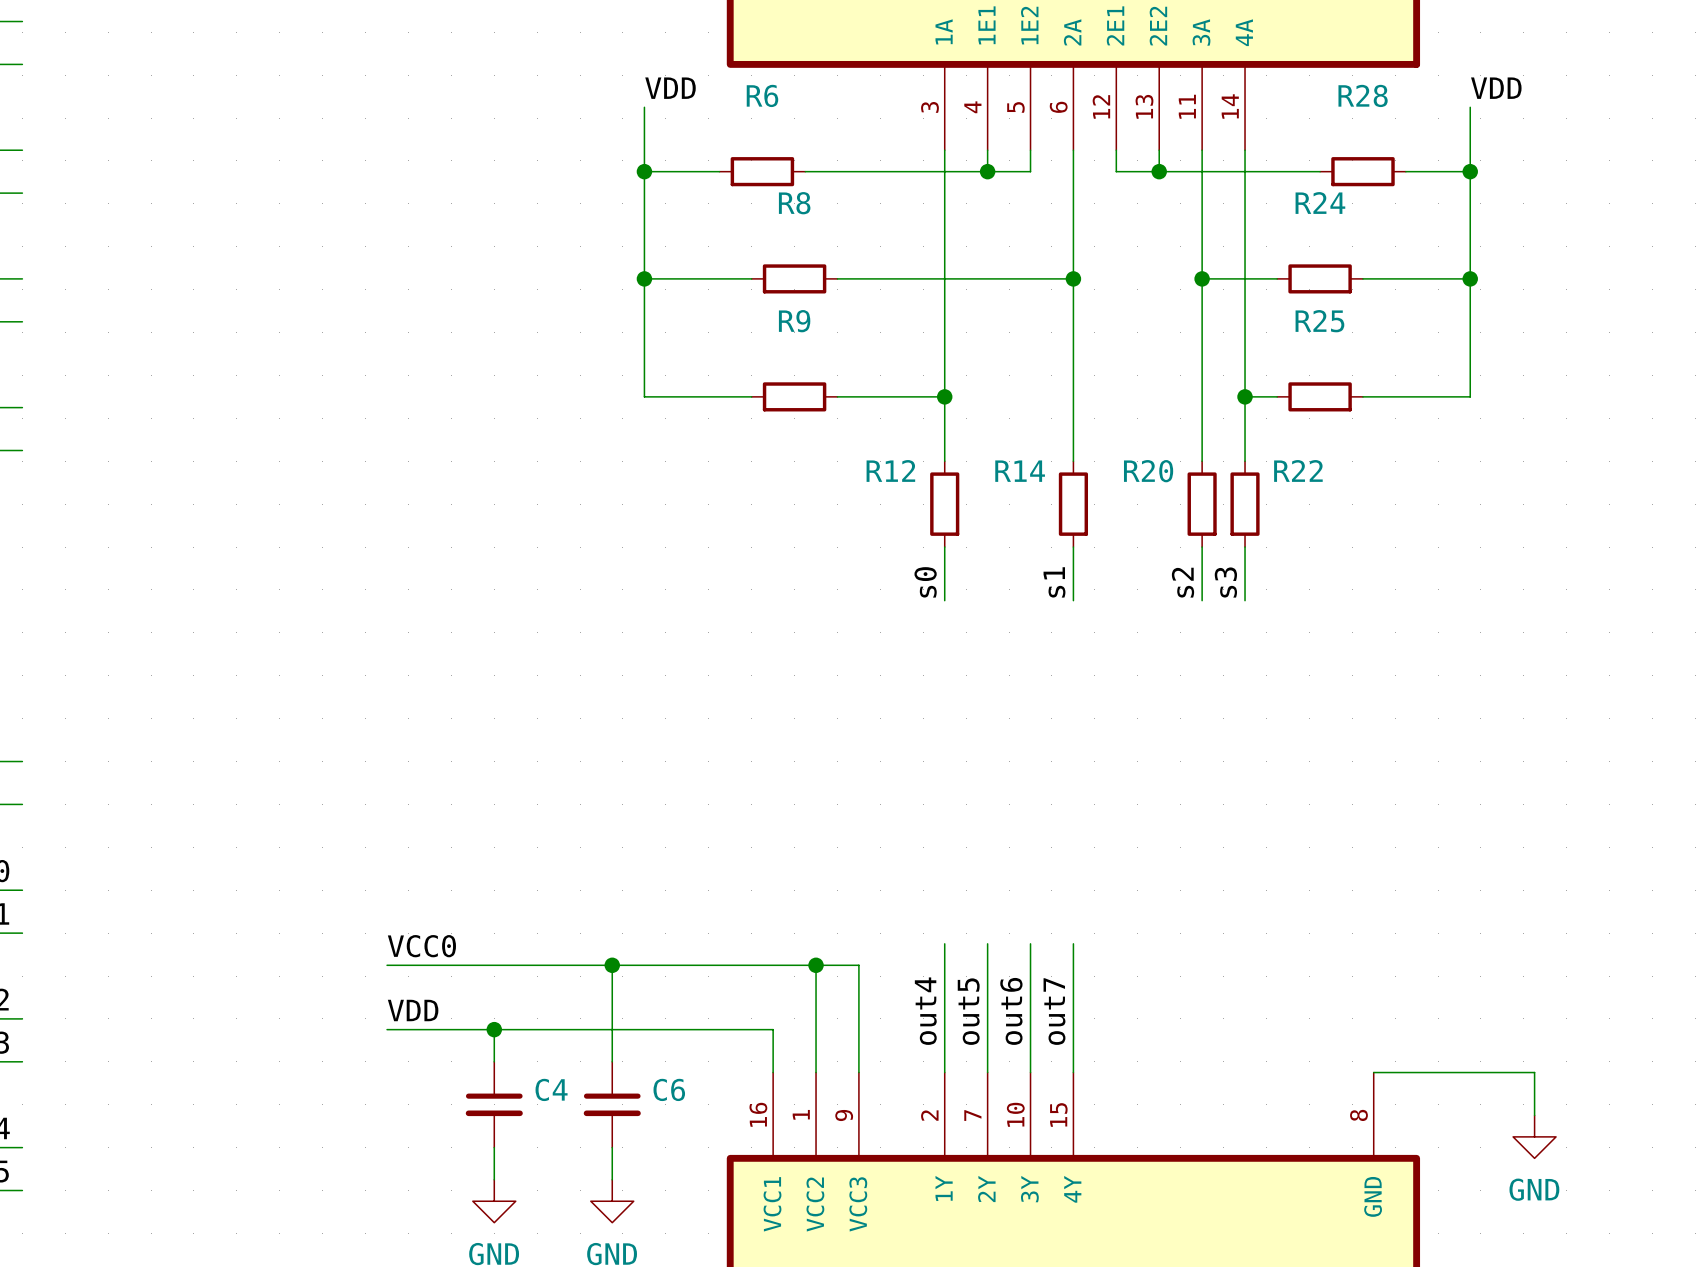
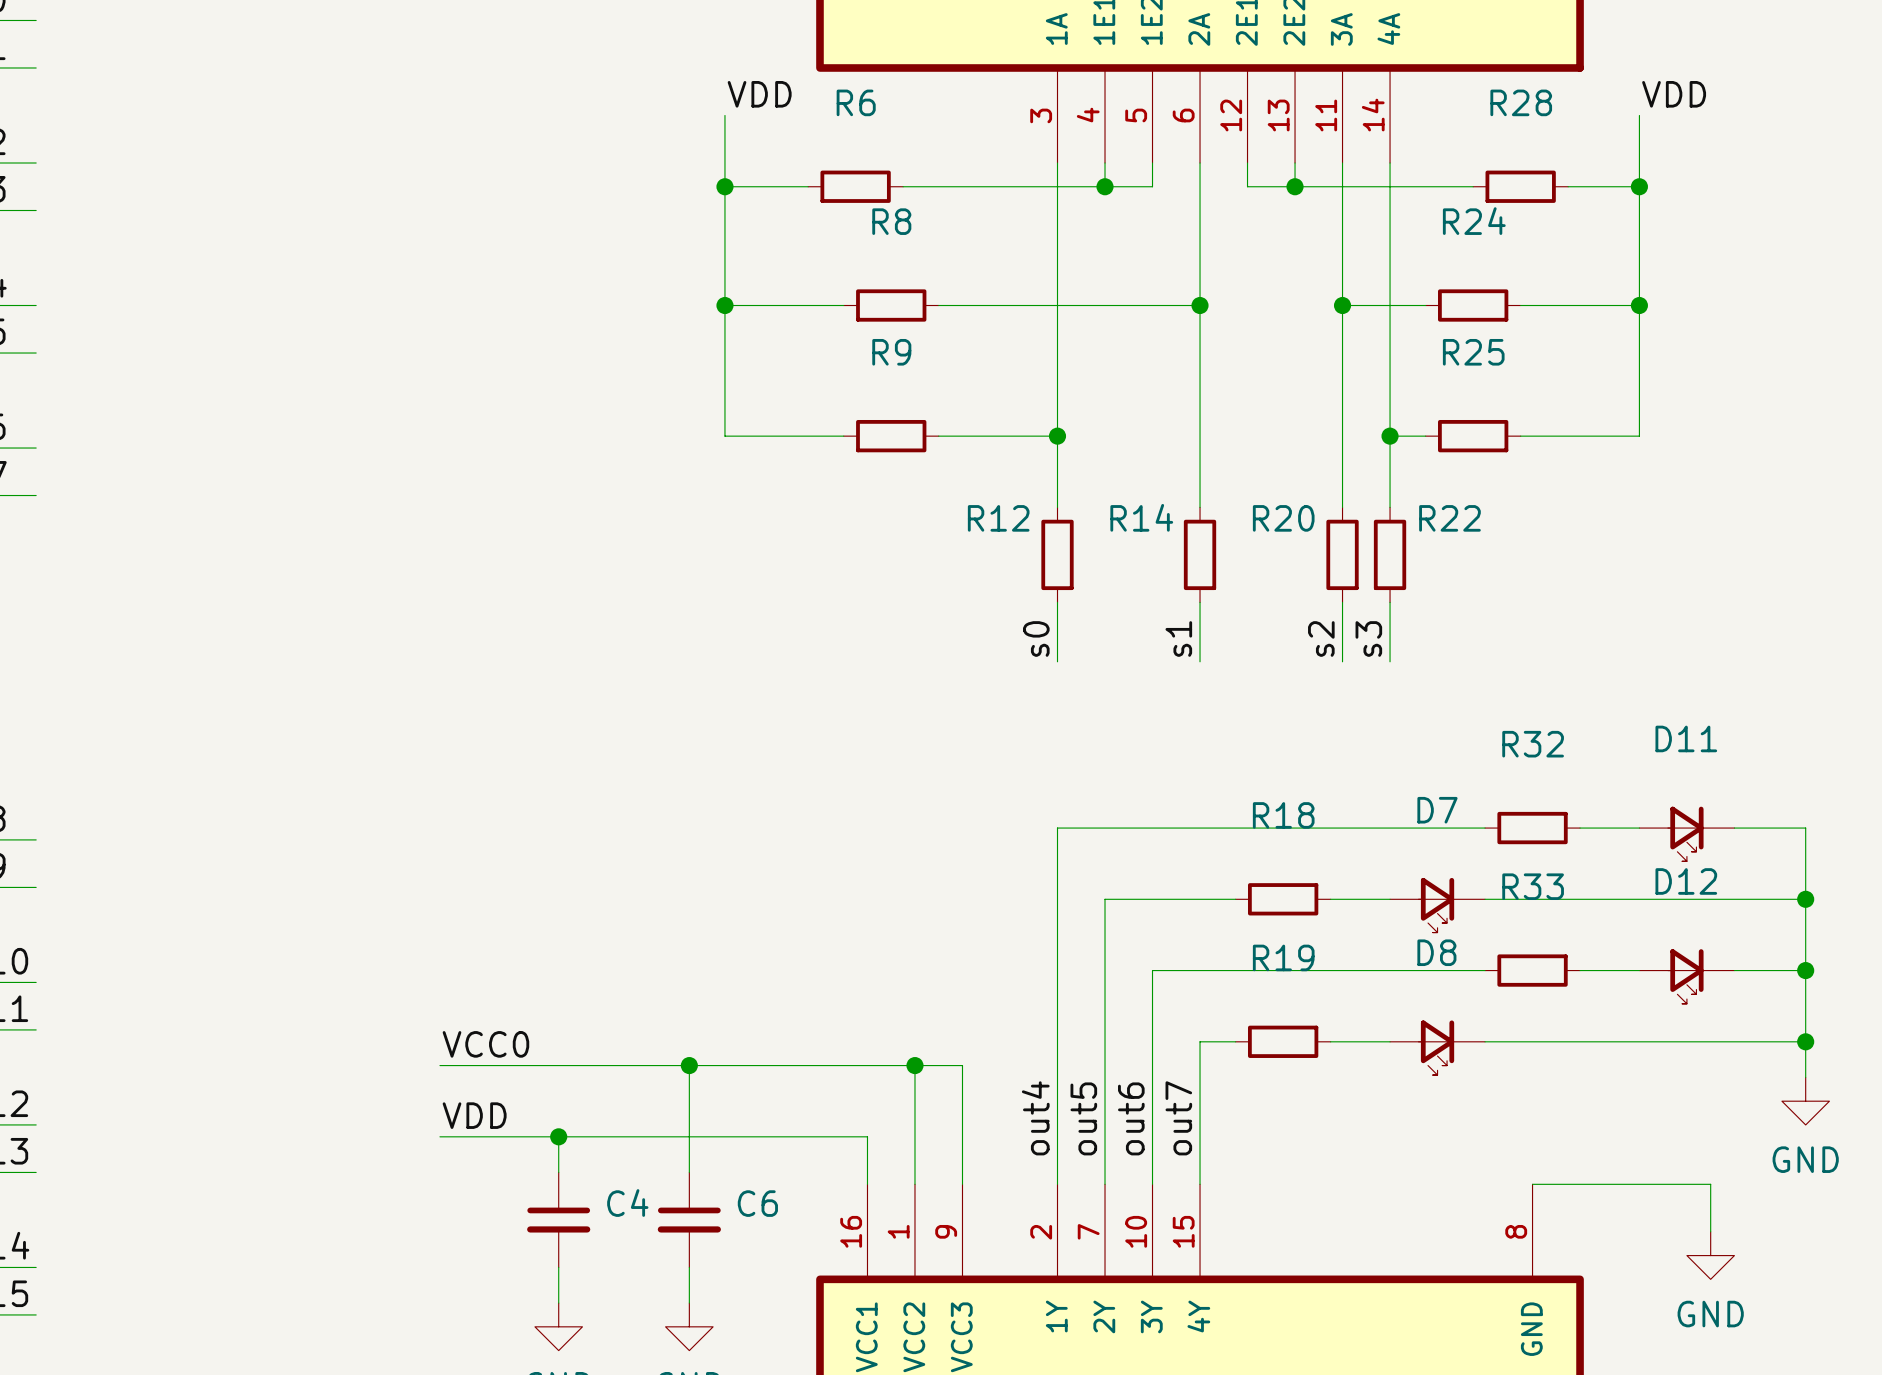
wire: none -> (1485, 828) (1057, 828) (1057, 1041)
R32: none -> (1532, 828)
wire: none -> (1580, 828) (1639, 828)
wire: none -> (1734, 828) (1805, 828) (1805, 1077)
D11: none -> (1686, 833)
wire: none -> (1235, 899) (1105, 899) (1105, 1041)
R18: none -> (1283, 899)
wire: none -> (1330, 899) (1390, 899)
wire: none -> (1485, 899) (1805, 899)
junction: none -> (1805, 899)
D7: none -> (1437, 905)
wire: none -> (1485, 970) (1152, 970) (1152, 1041)
R33: none -> (1532, 970)
wire: none -> (1580, 970) (1639, 970)
wire: none -> (1734, 970) (1805, 970)
junction: none -> (1805, 970)
D12: none -> (1686, 976)
wire: none -> (1200, 1041) (1235, 1041)
R19: none -> (1283, 1041)
wire: none -> (1330, 1041) (1390, 1041)
wire: none -> (1485, 1041) (1805, 1041)
junction: none -> (1805, 1041)
D8: none -> (1437, 1047)
power symbol: none -> GND (1805, 1101)

